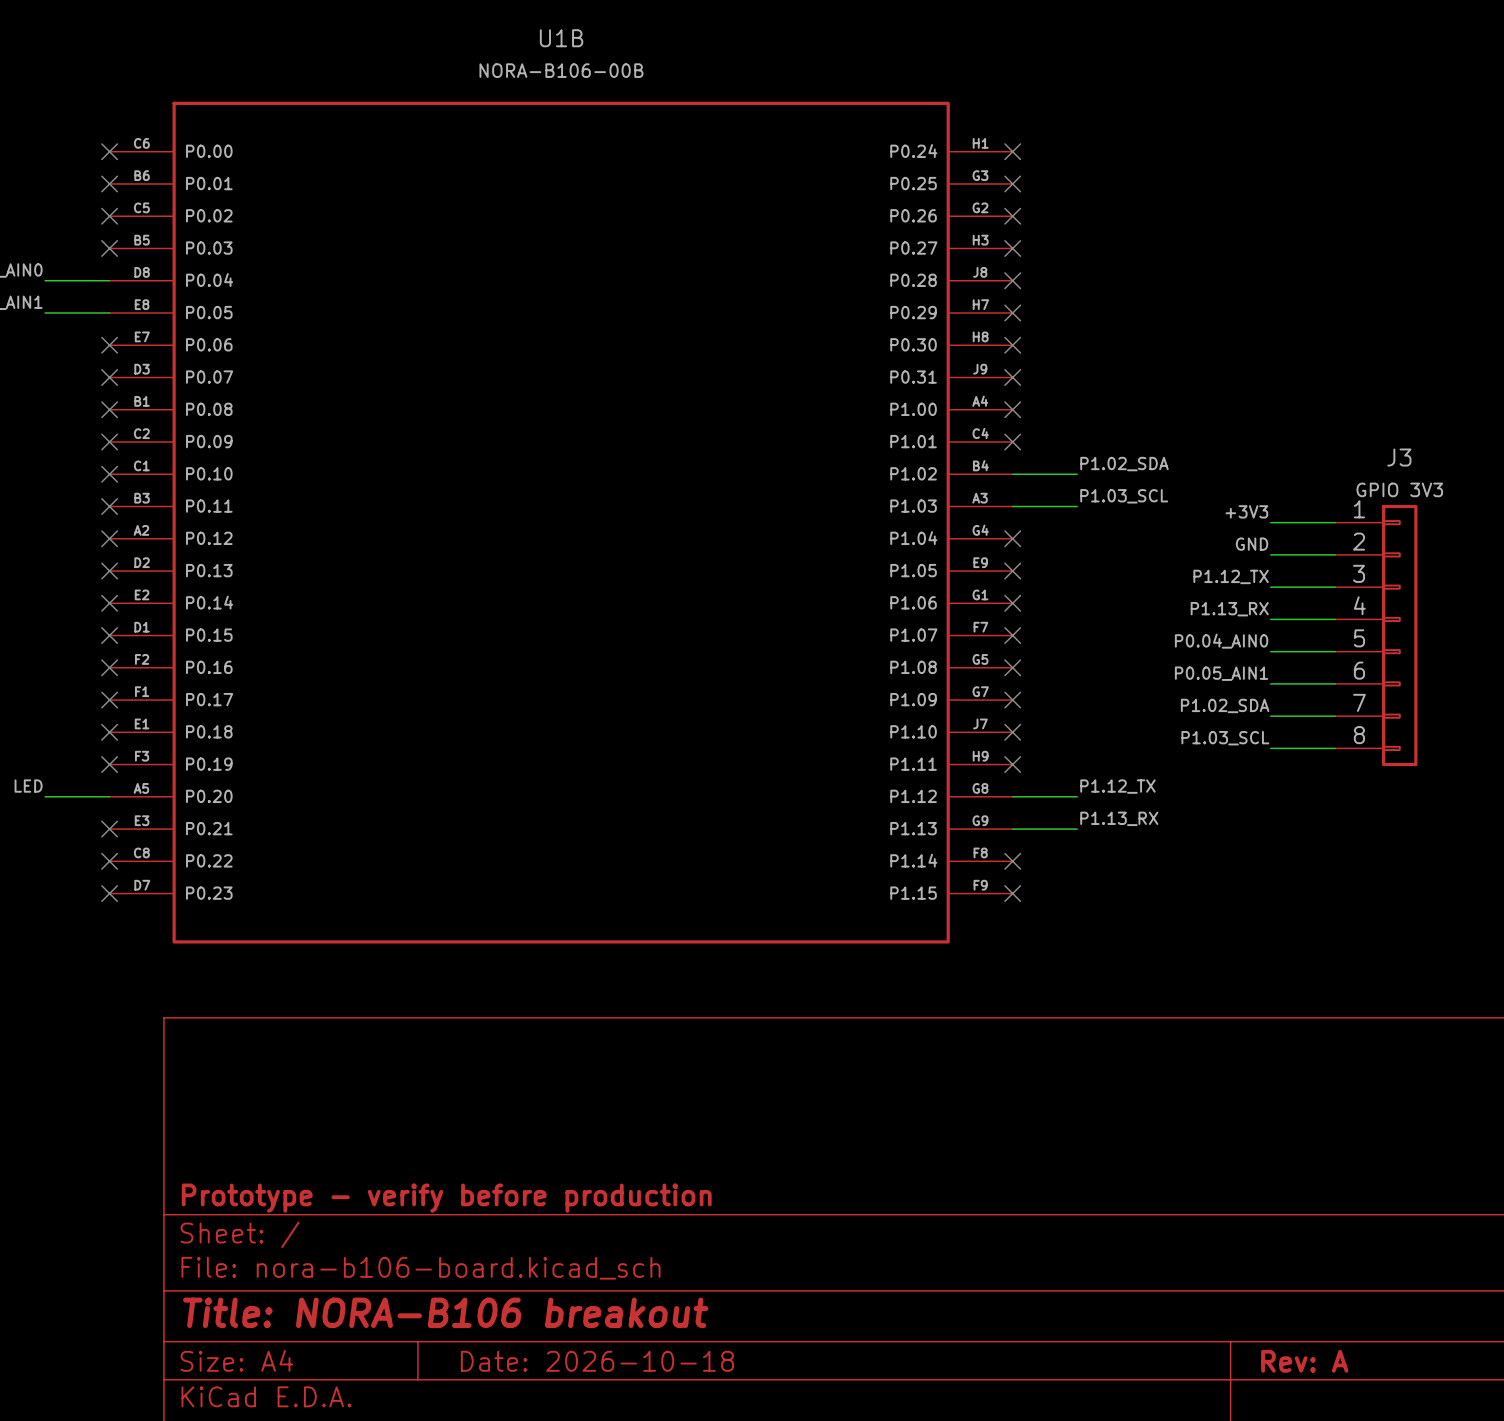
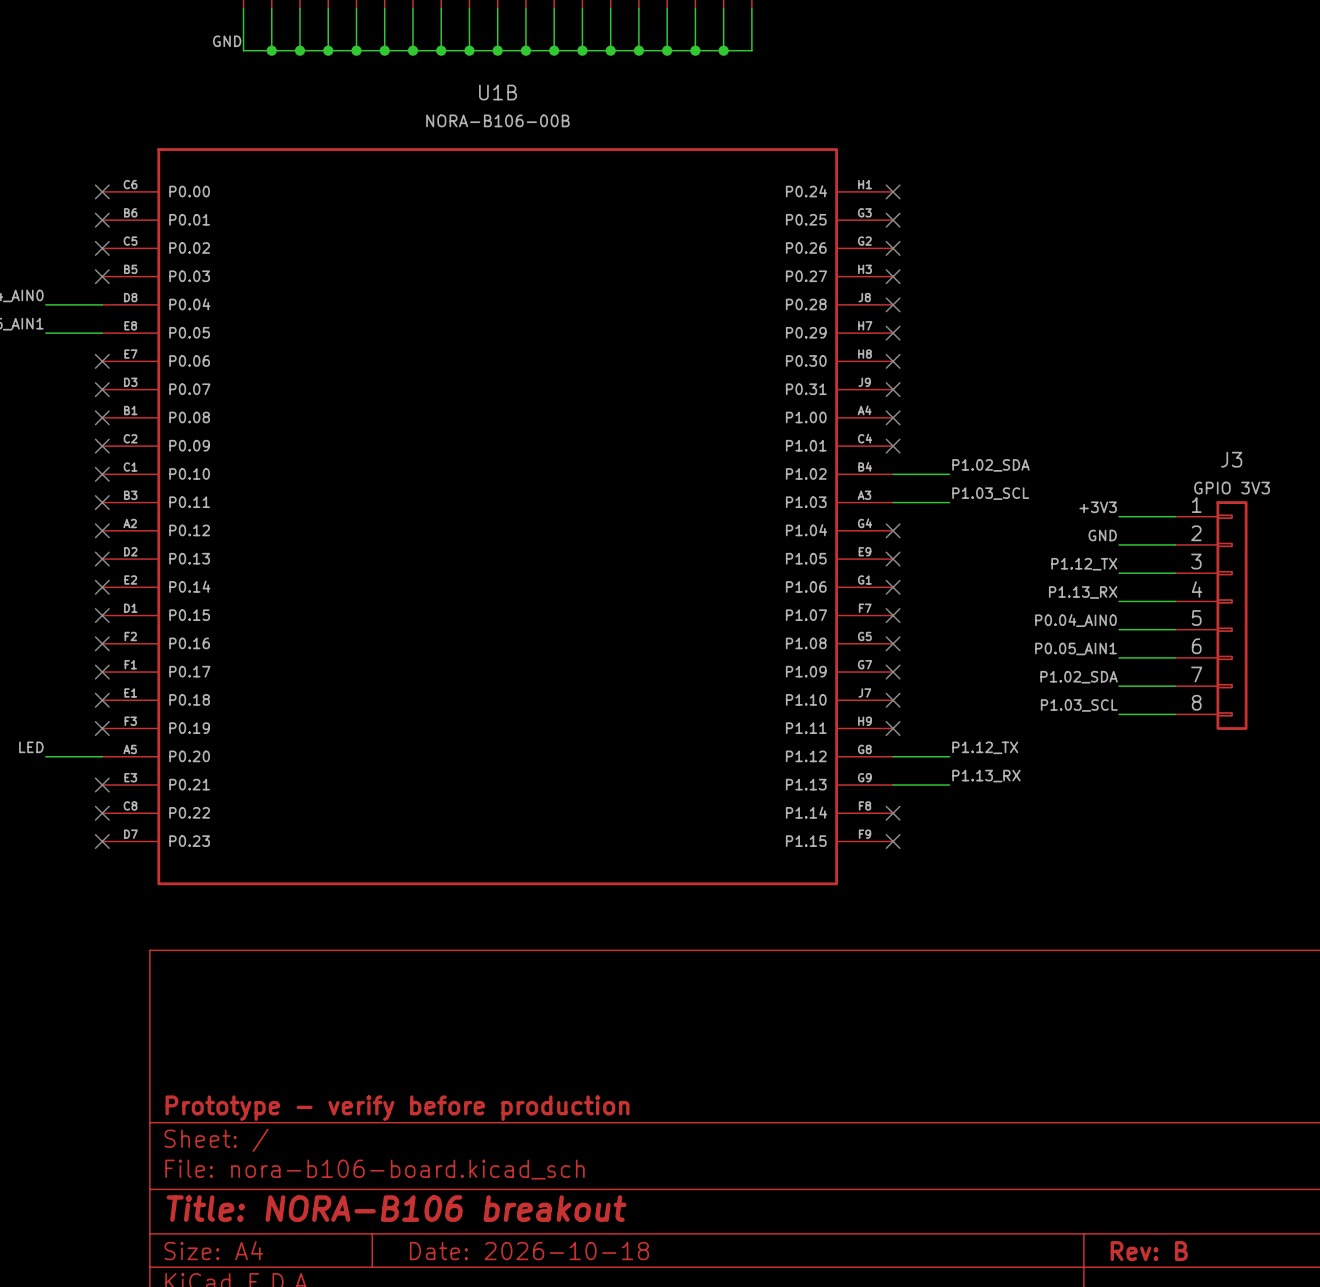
title block: Rev: A (1304, 1361) -> Rev: B (1149, 1251)

